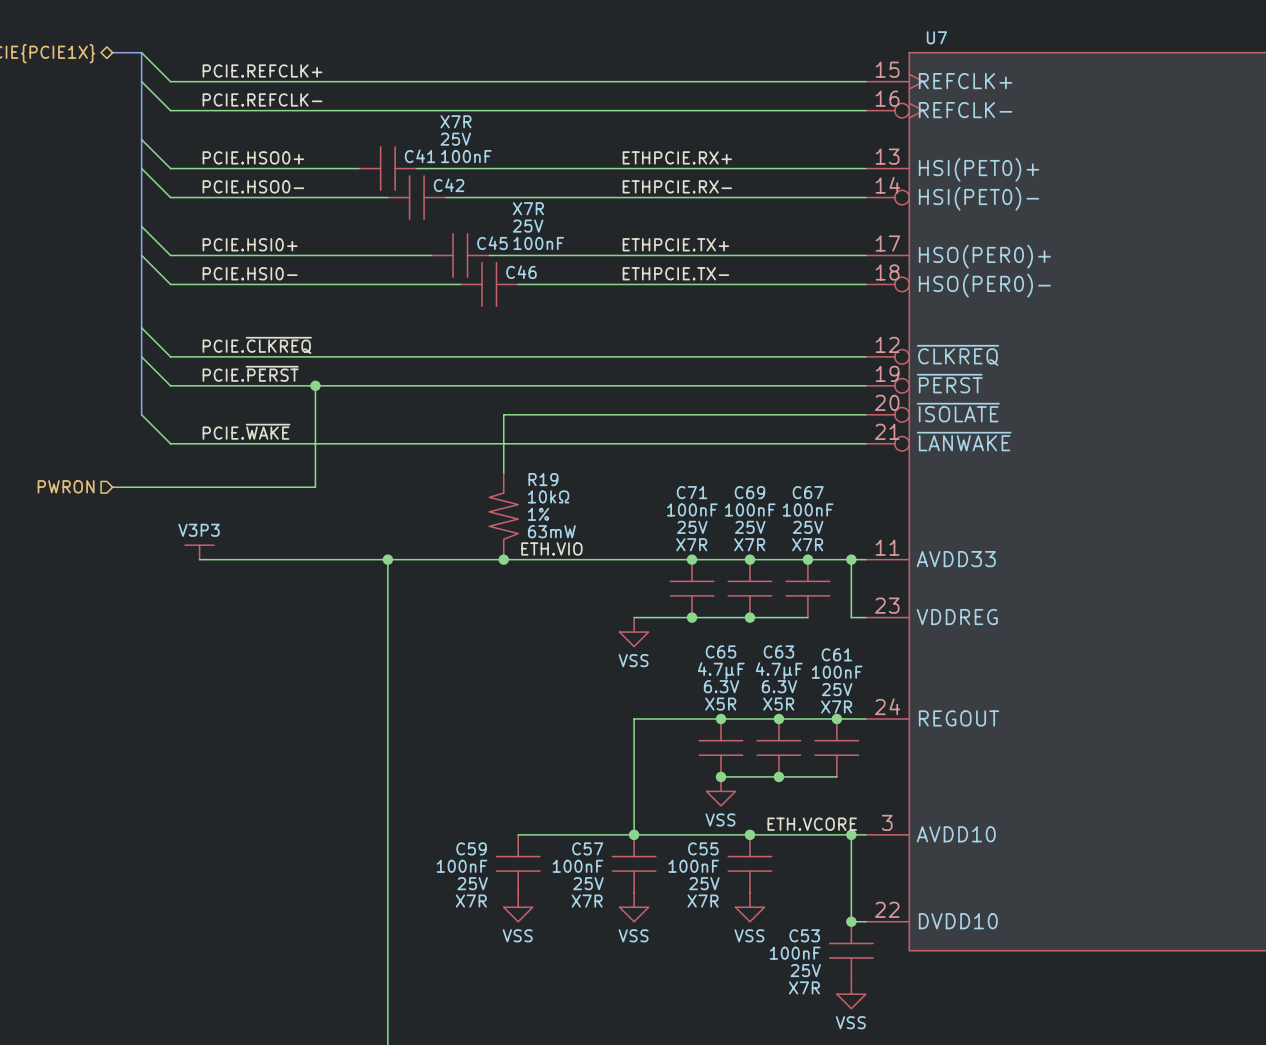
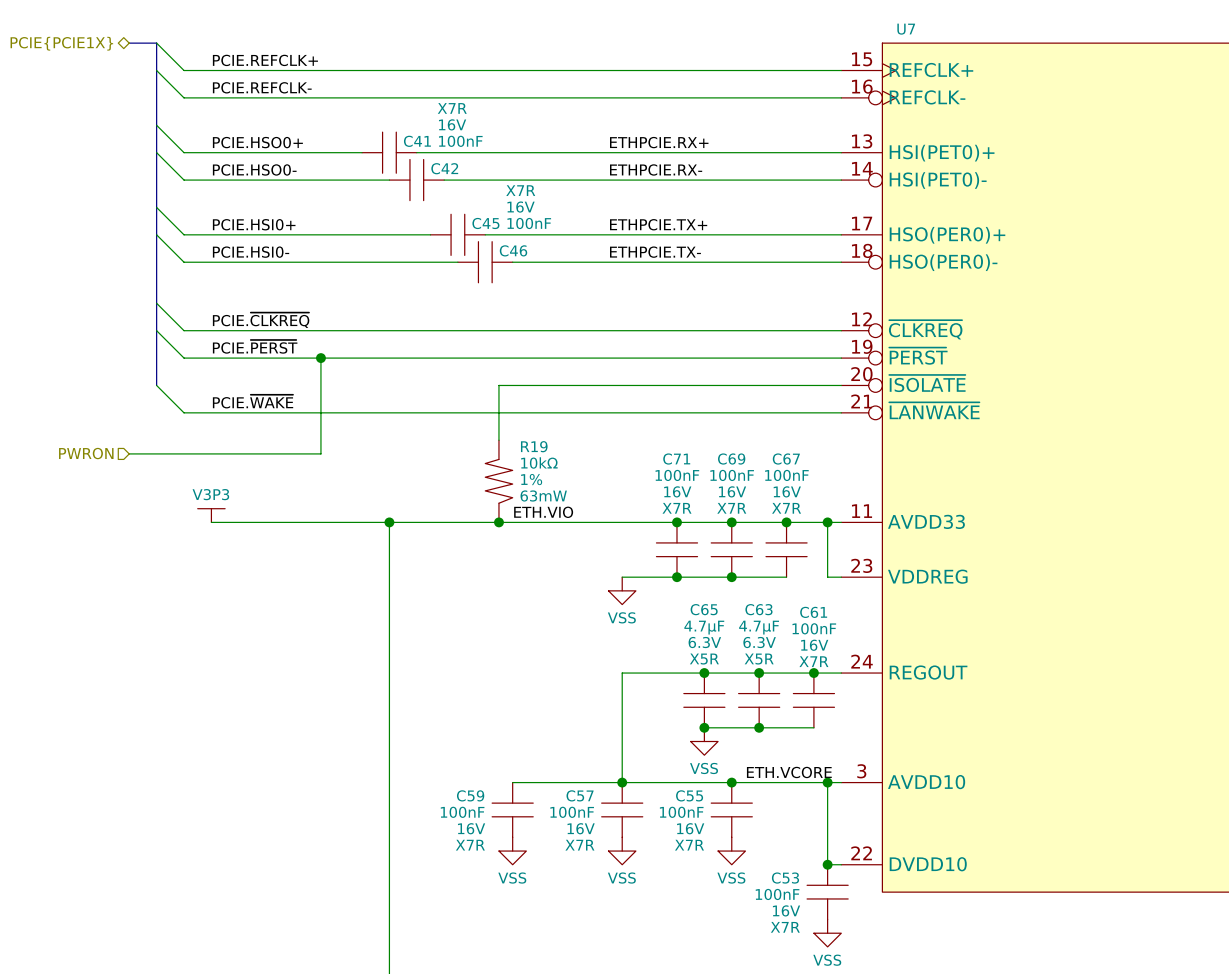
C41 text: 25V (455, 139) -> 16V (452, 124)
C45 text: 25V (528, 226) -> 16V (521, 207)
C71 text: 25V (692, 527) -> 16V (677, 491)
C69 text: 25V (750, 527) -> 16V (732, 491)
C67 text: 25V (808, 527) -> 16V (787, 491)
C61 text: 25V (837, 689) -> 16V (814, 645)
C59 text: 25V (472, 883) -> 16V (471, 828)
C57 text: 25V (588, 883) -> 16V (581, 828)
C55 text: 25V (704, 883) -> 16V (690, 828)
C53 text: 25V (805, 970) -> 16V (786, 910)

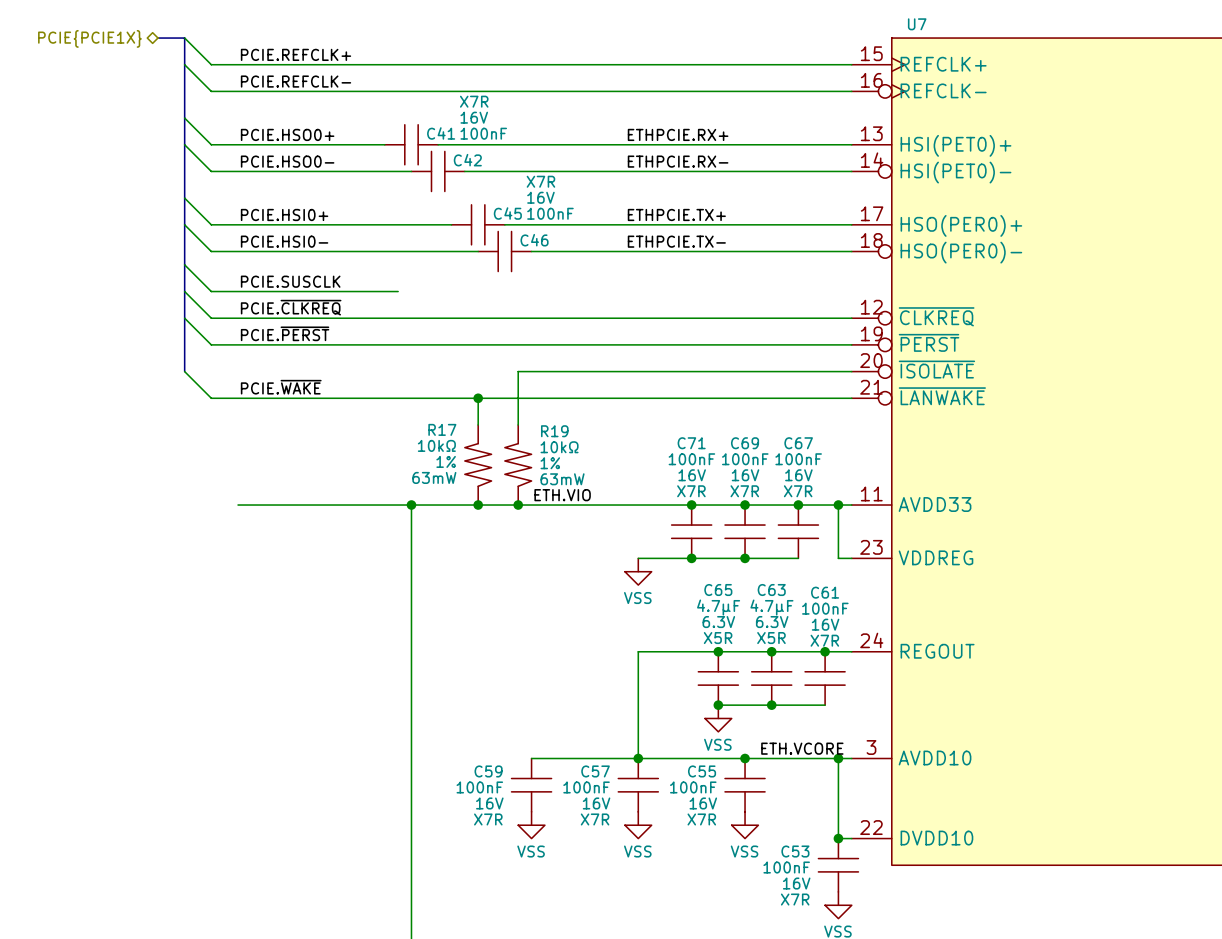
wire: none -> (184, 264) (211, 291) (398, 291)
label: none -> PCIE.SUSCLK (290, 281)
wire: (320, 358) (320, 453) (129, 453) -> none
junction: (320, 358) -> none
wire: none -> (478, 398) (478, 424)
junction: none -> (478, 398)
hierarchical label: PWRON (86, 453) -> none
R17: none -> (478, 464)
power symbol: V3P3 (211, 515) -> none
junction: none -> (478, 505)

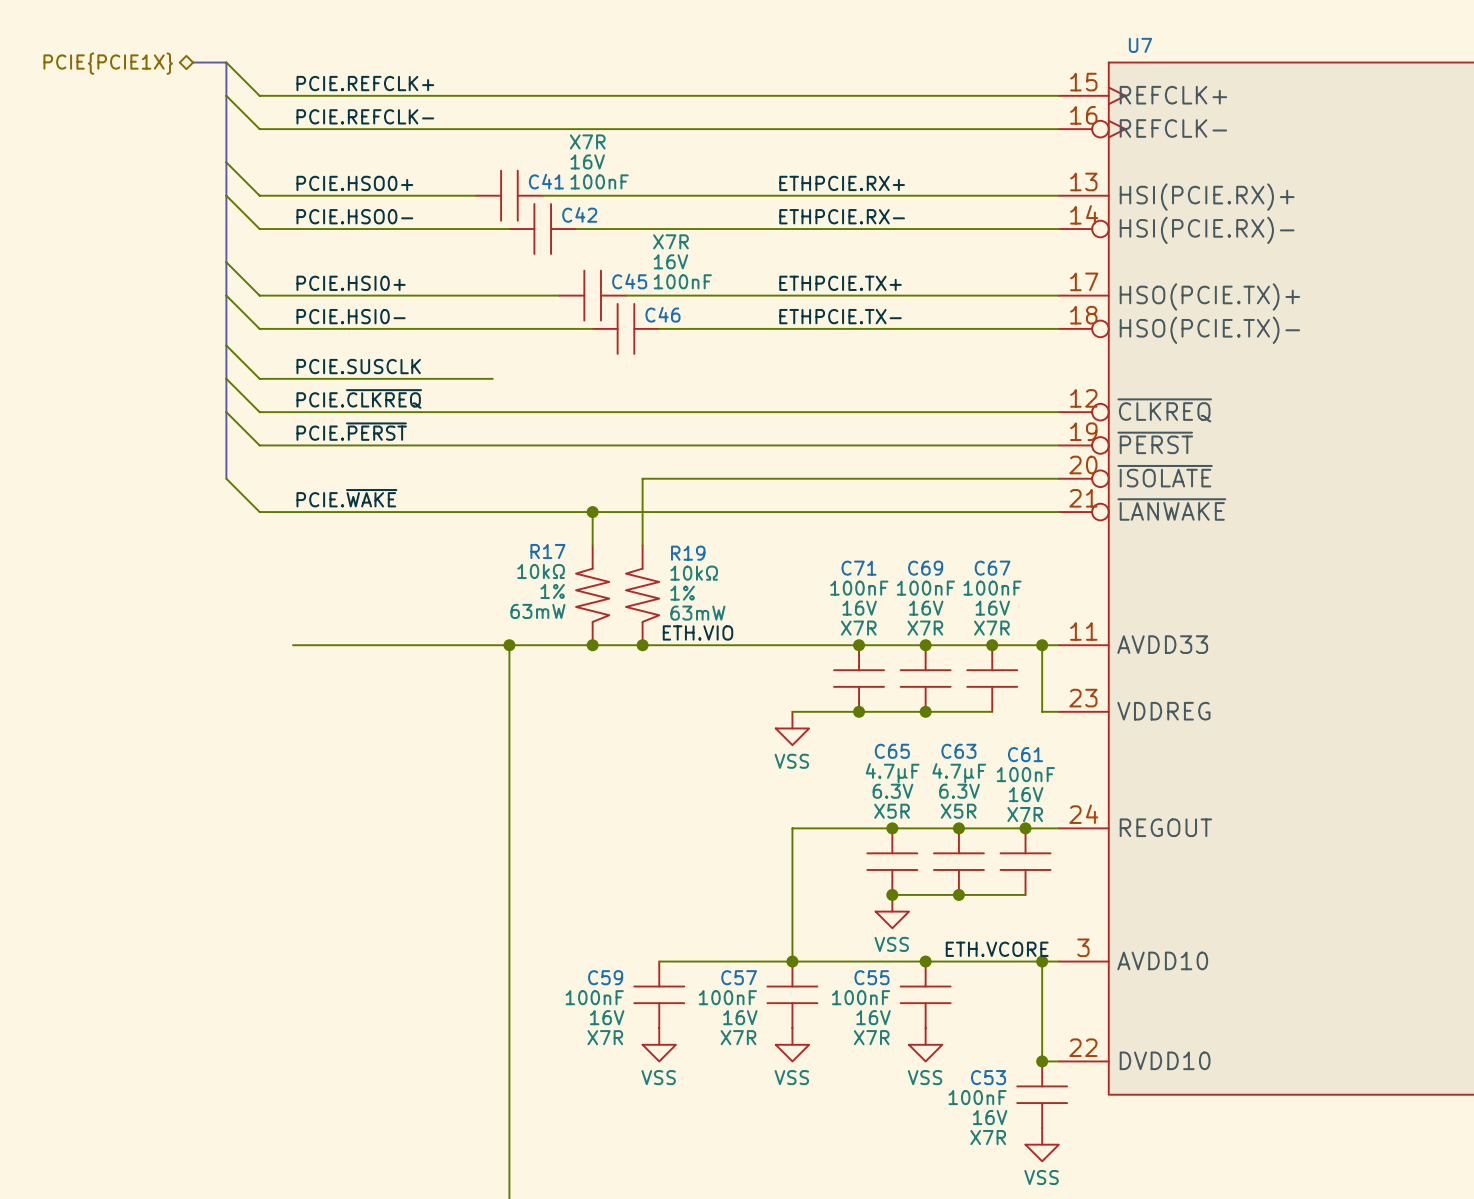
U7 pin name: HSI(PET0)+ (956, 145) -> HSI(PCIE.RX)+ (1207, 197)
U7 pin name: HSI(PET0)- (956, 172) -> HSI(PCIE.RX)- (1207, 230)
U7 pin name: HSO(PER0)+ (961, 225) -> HSO(PCIE.TX)+ (1209, 296)
U7 pin name: HSO(PER0)- (961, 252) -> HSO(PCIE.TX)- (1209, 330)

